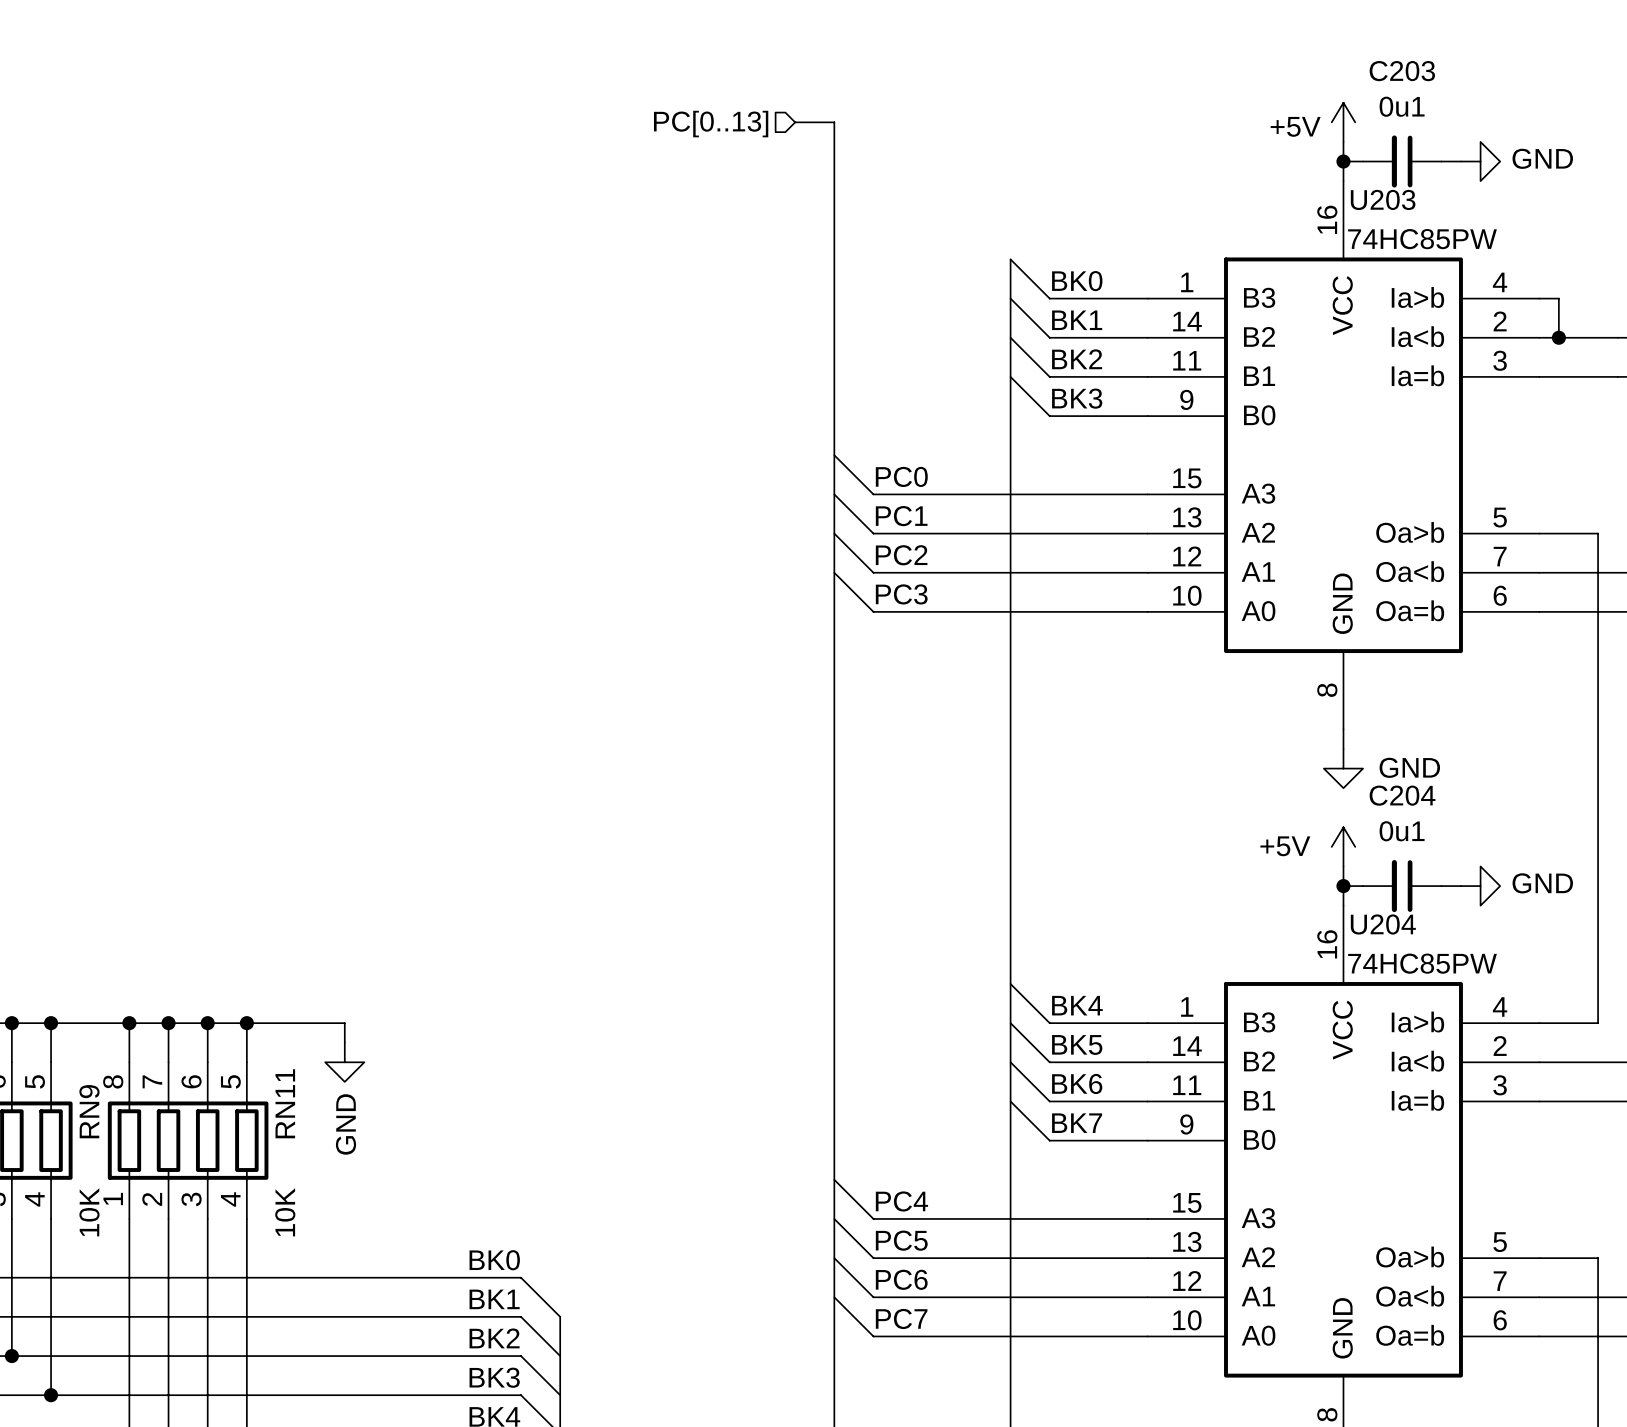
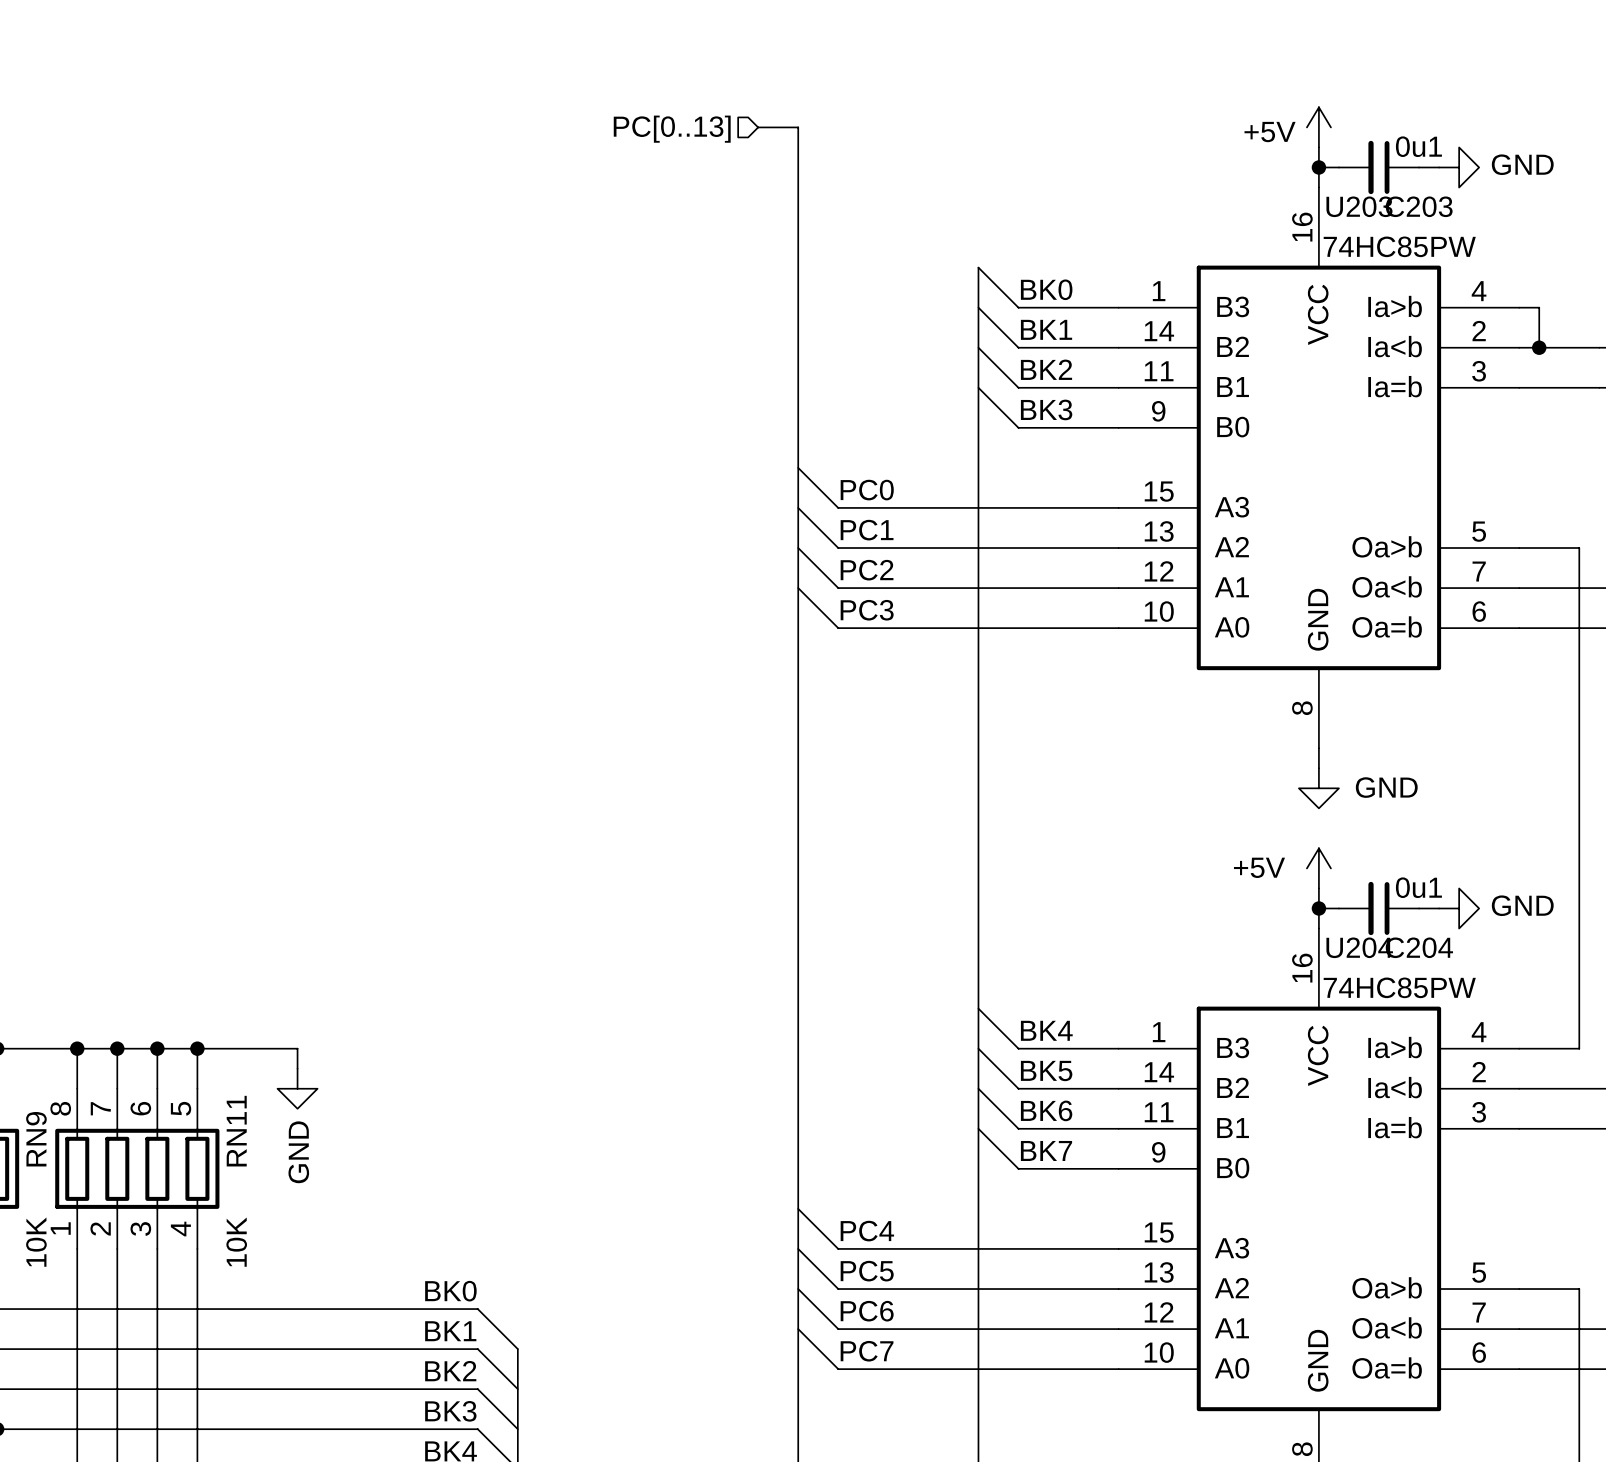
C203 name position: C203 (1402, 71) -> C203 (1419, 206)
C203 value position: 0u1 (1402, 106) -> 0u1 (1418, 146)
C204 name position: C204 (1402, 795) -> C204 (1419, 947)
C204 value position: 0u1 (1402, 831) -> 0u1 (1418, 887)

